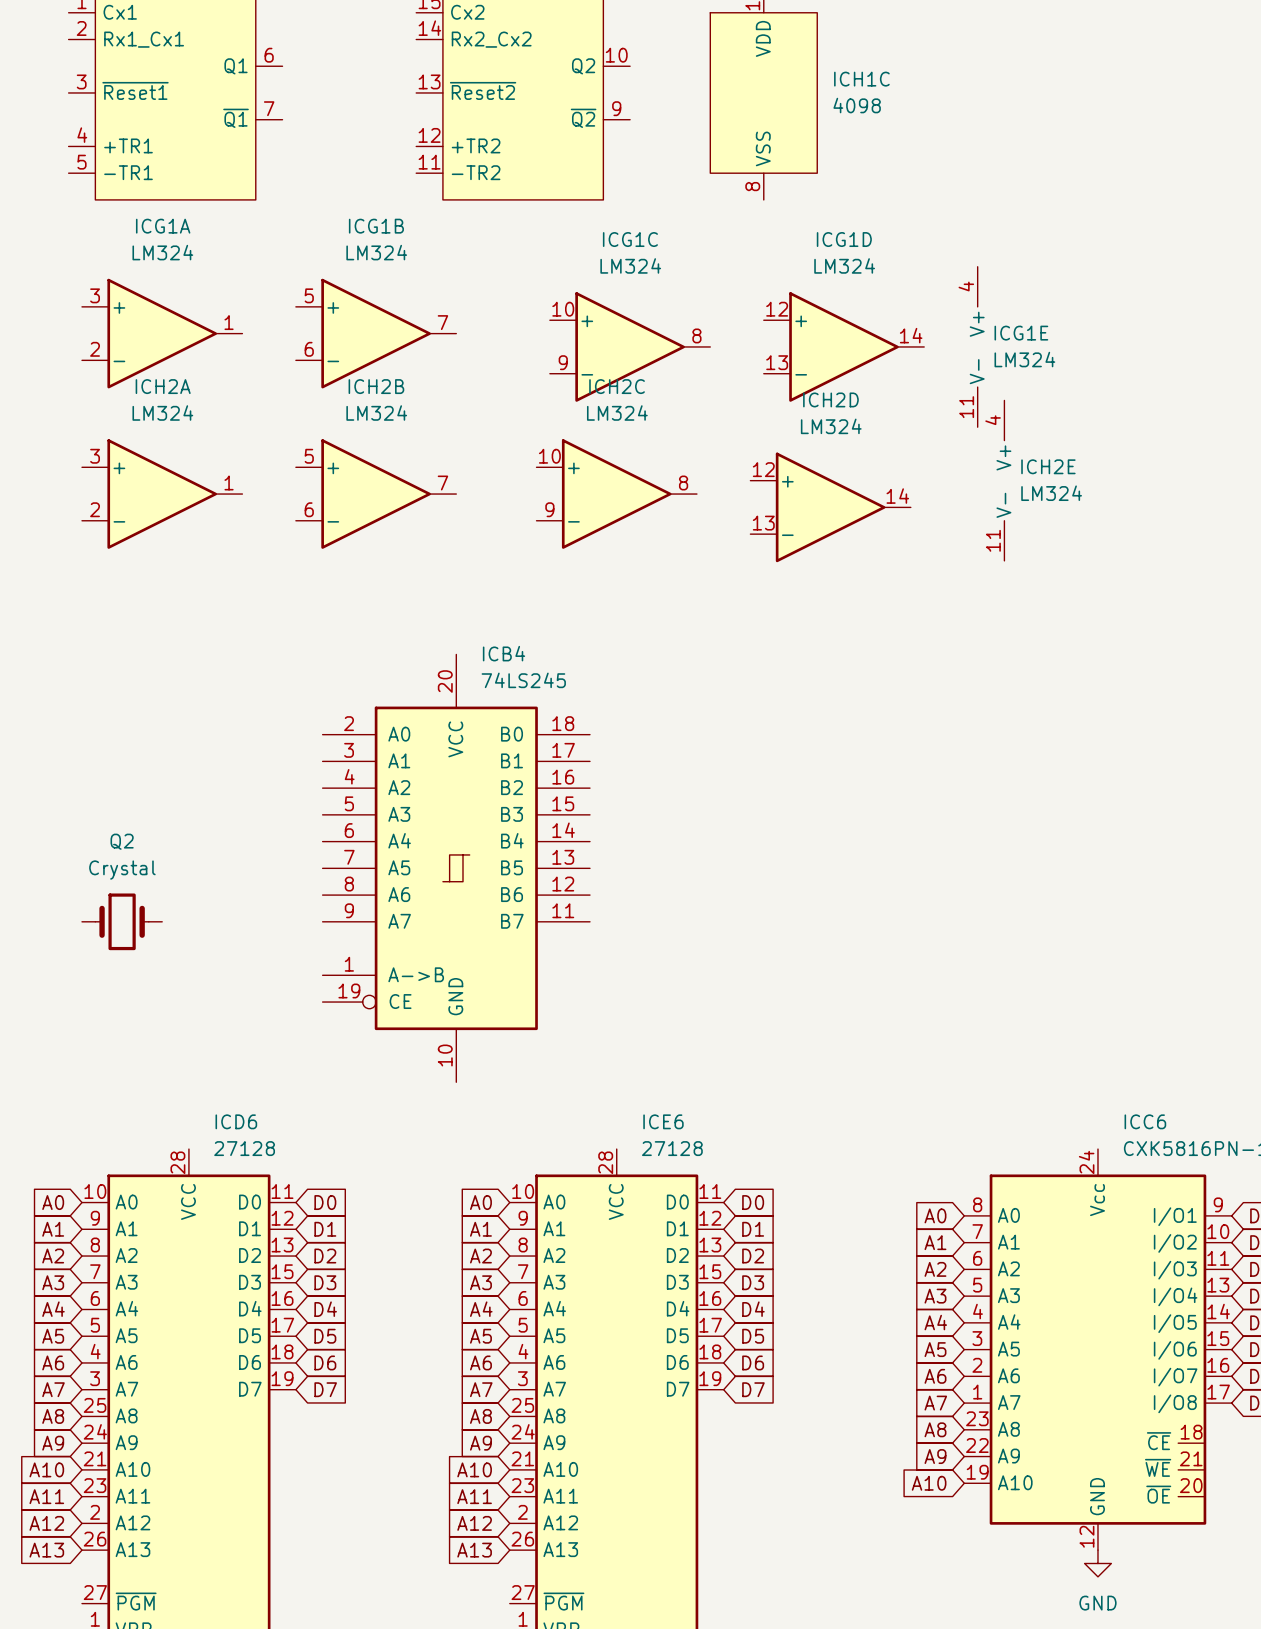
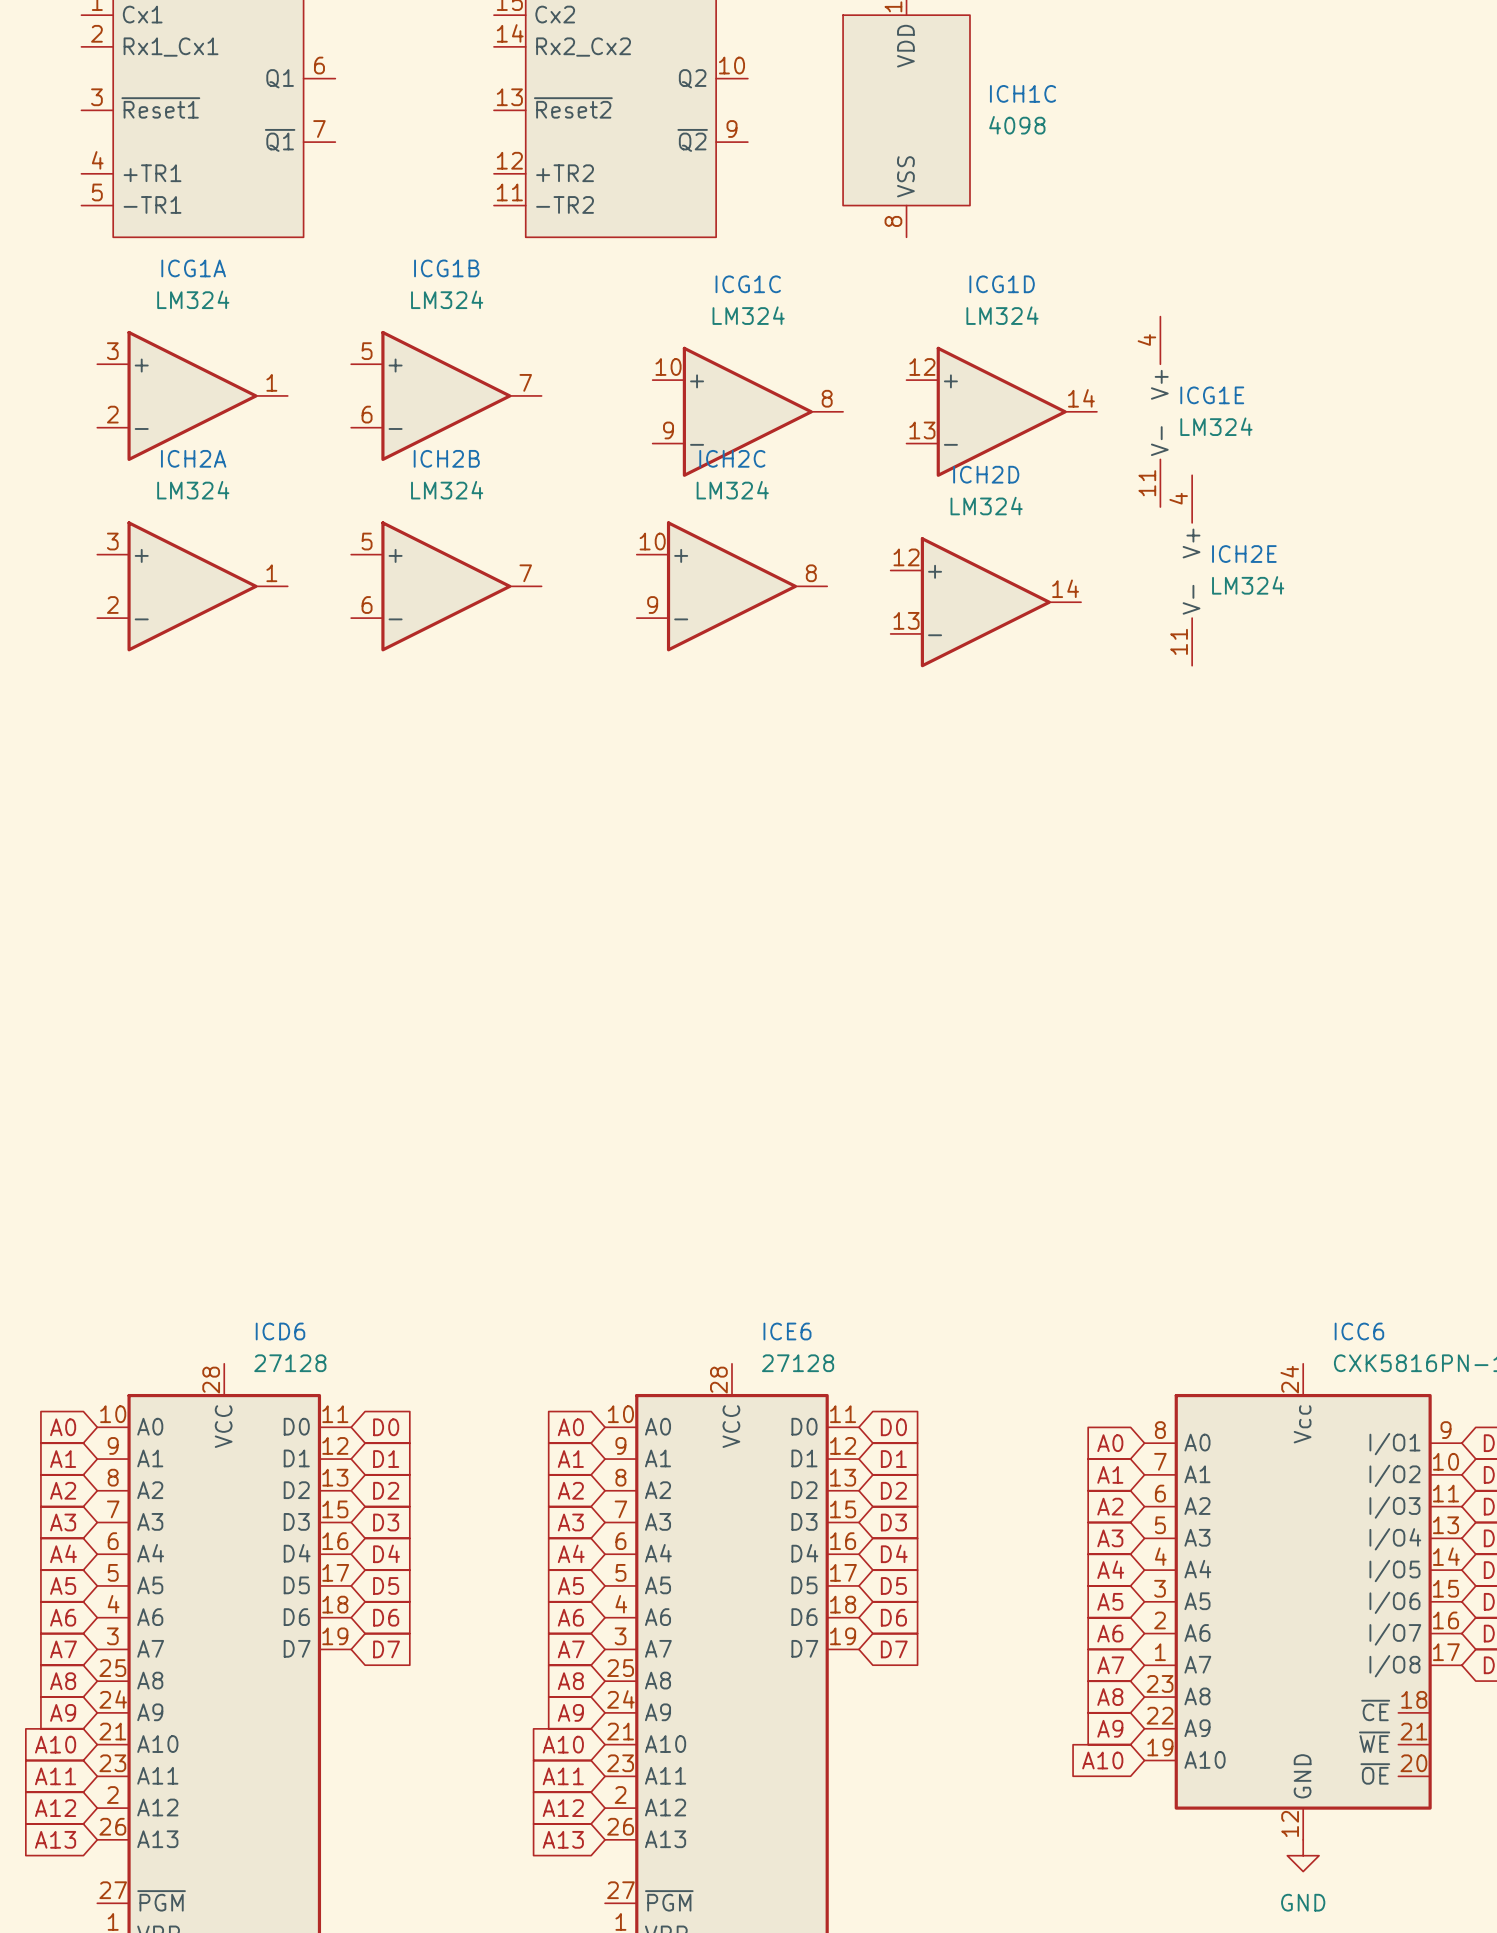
ICB4: 74LS245 (456, 868) -> none
Q2: Crystal (122, 921) -> none

